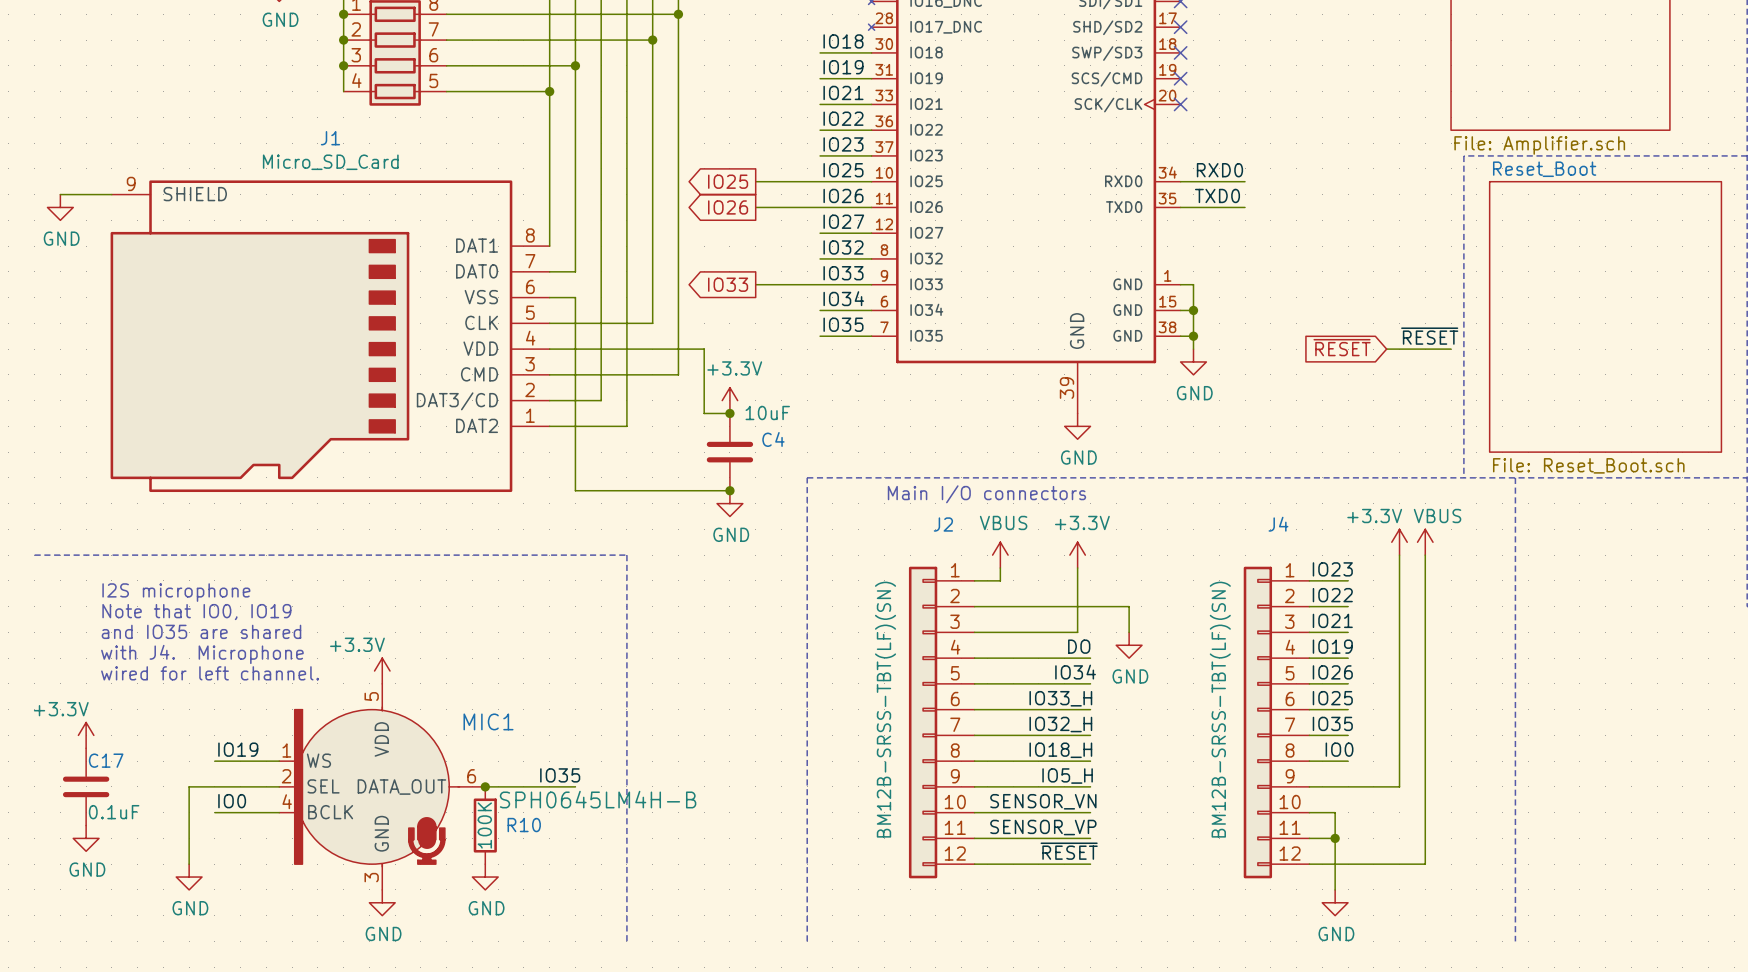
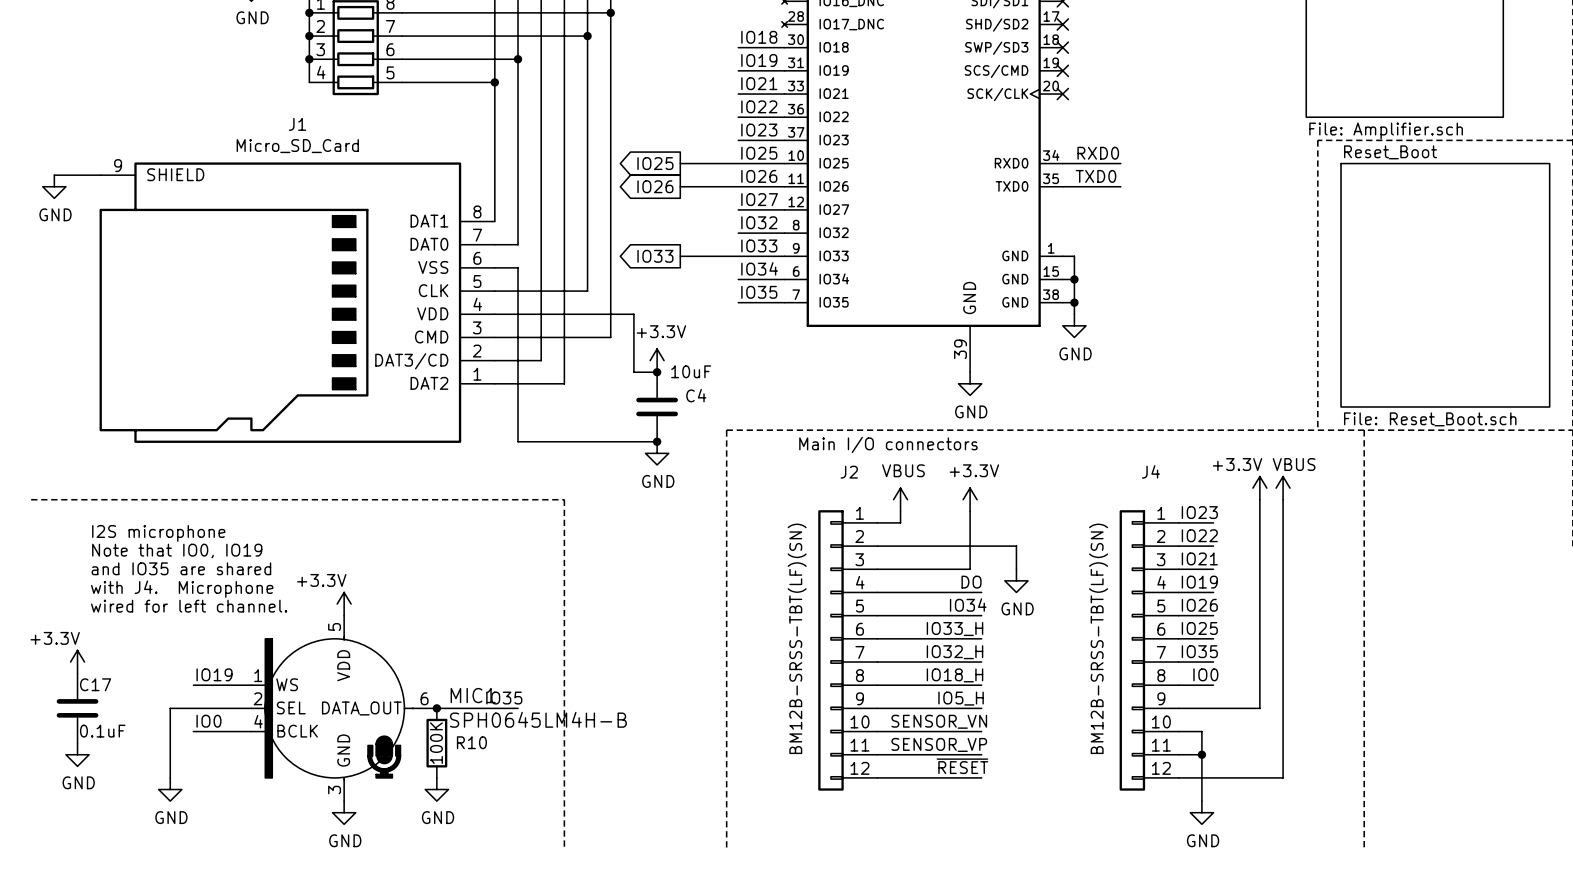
label: ~{RESET} (1429, 336) -> none
global label: ~{RESET} (1342, 347) -> none
wire: (1386, 349) (1451, 349) -> none
MIC1 name position: MIC1 (488, 721) -> MIC1 (473, 695)

